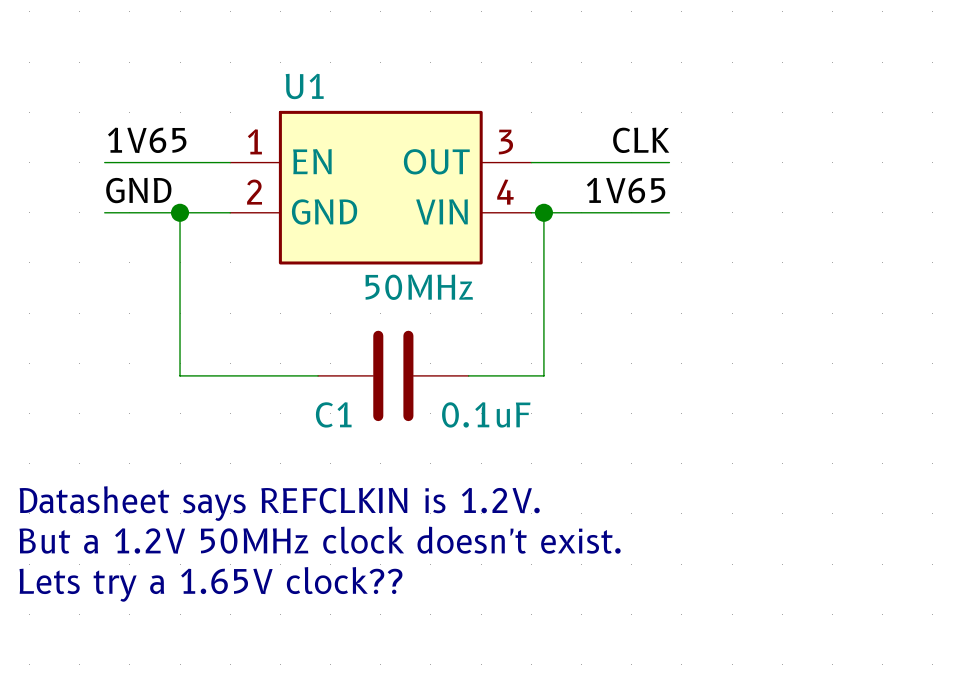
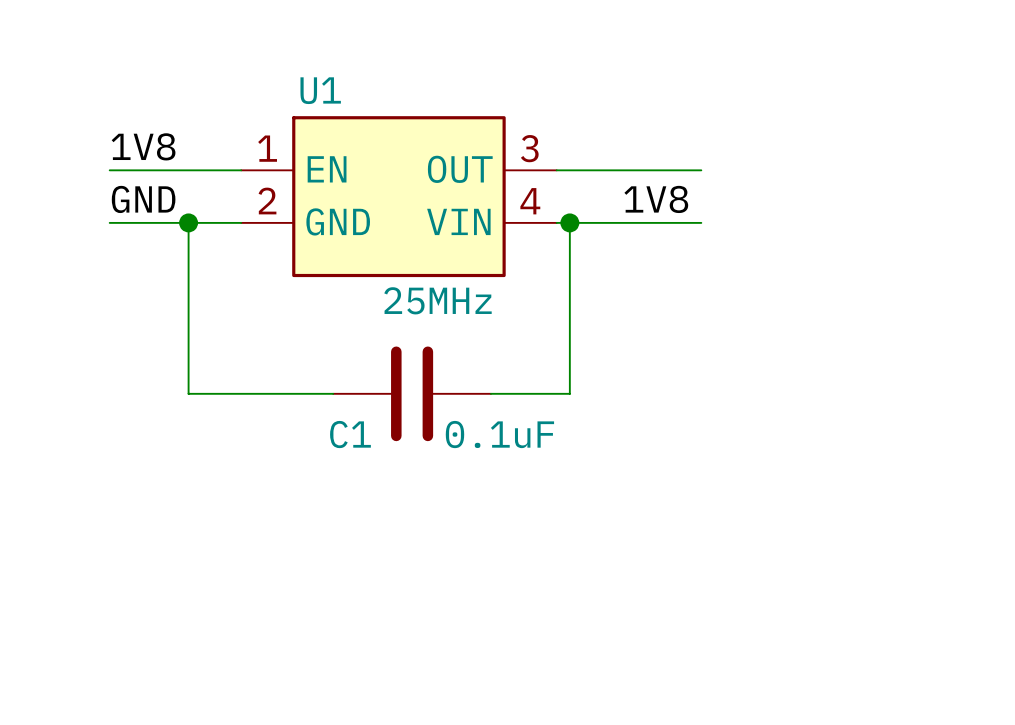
label: 1V65 (147, 140) -> 1V8 (143, 146)
label: CLK (641, 140) -> none
label: 1V65 (626, 190) -> none
label: none -> 1V8 (656, 199)
U1 value: 50MHz (419, 287) -> 25MHz (438, 300)
text: Datasheet says REFCLKIN is 1.2V. (279, 503) -> none
text: But a 1.2V 50MHz clock doesn't exist. (320, 540) -> none
text: Lets try a 1.65V clock?? (210, 584) -> none

